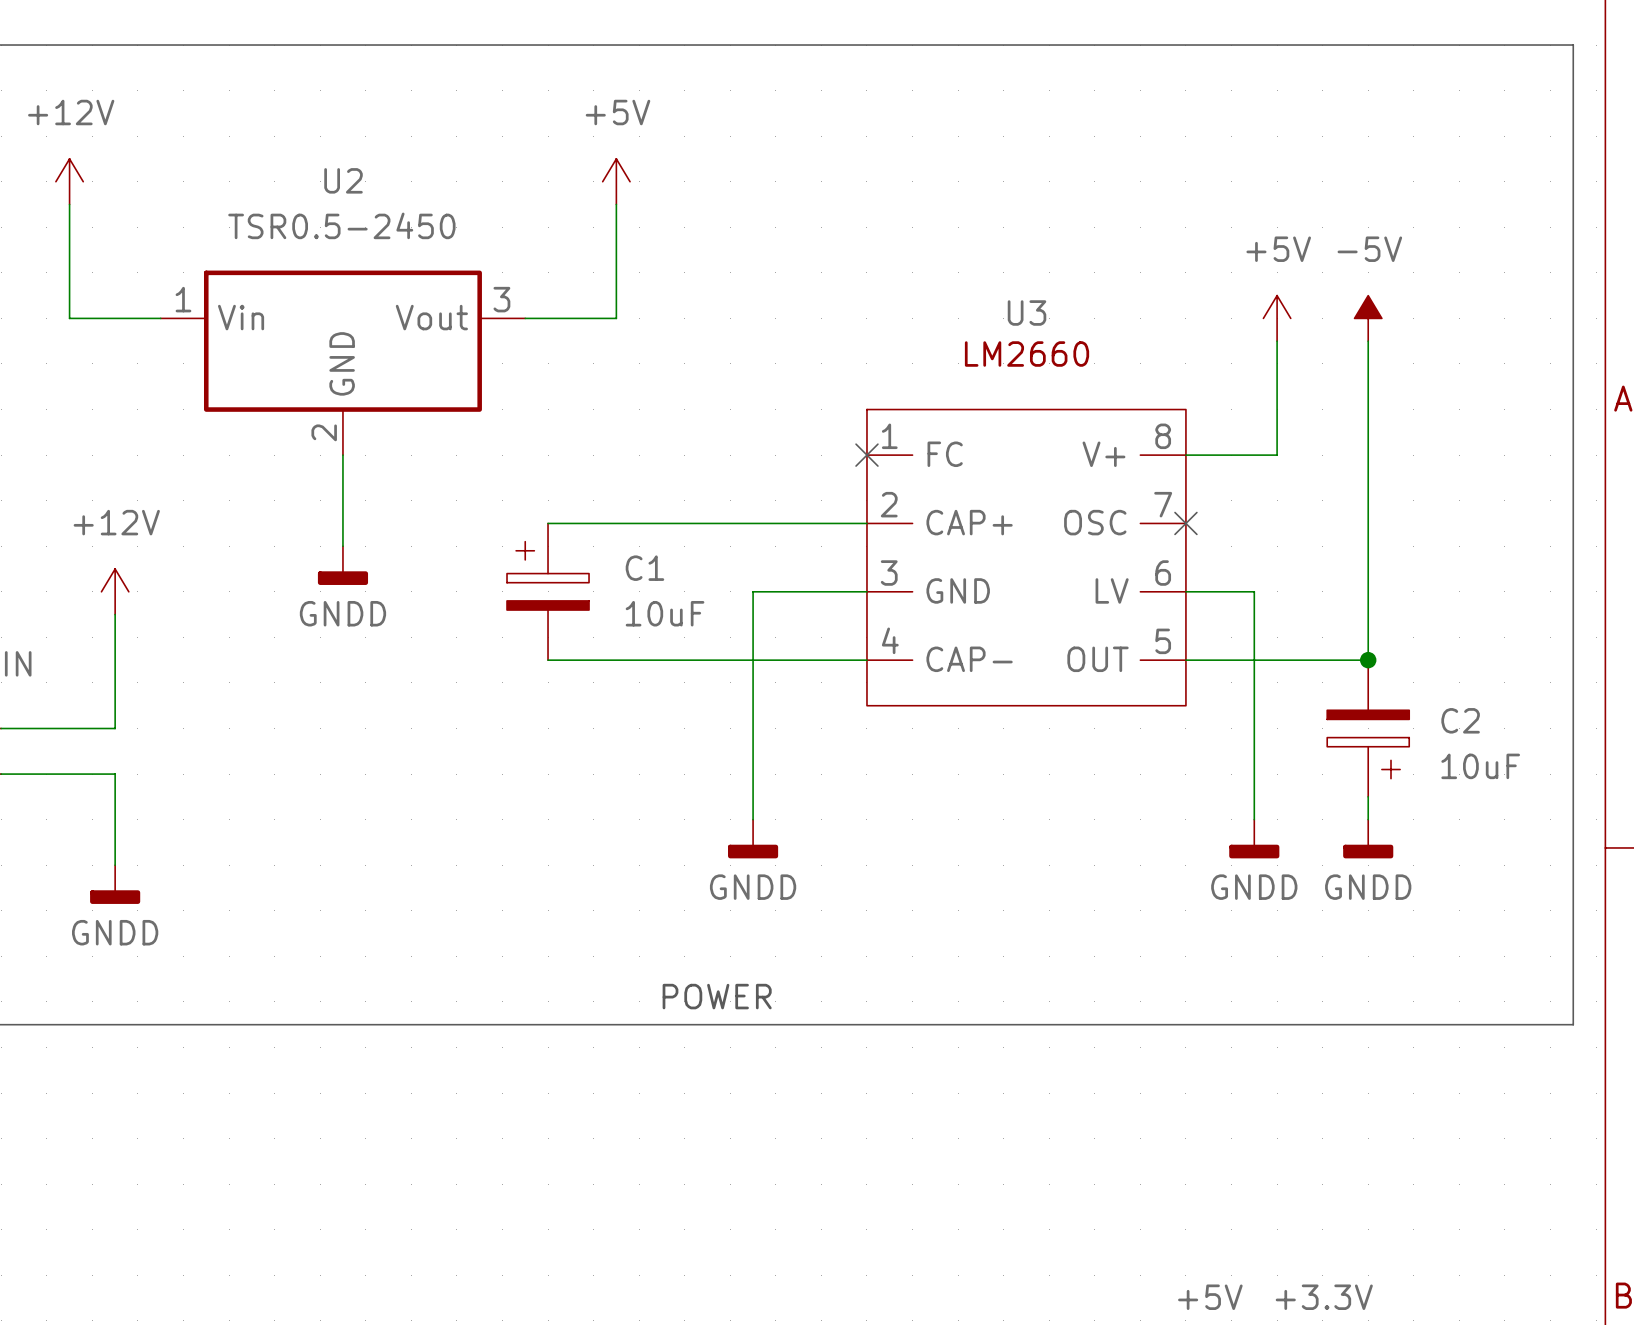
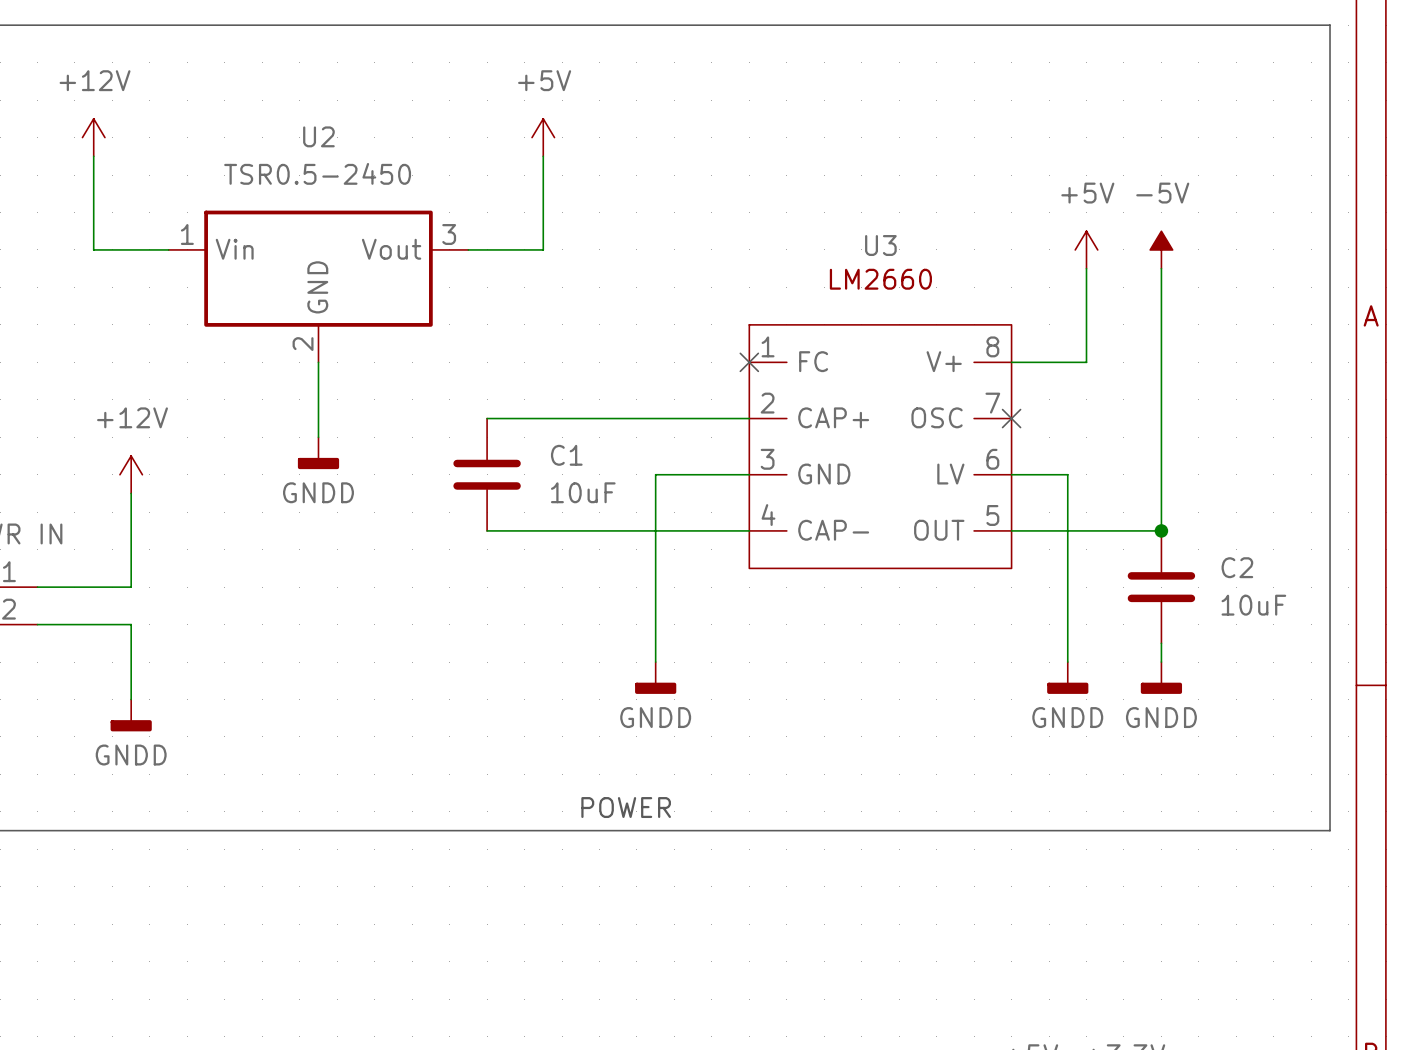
C1 symbol: [507, 523, 590, 661] -> [453, 418, 521, 531]
C2 symbol: [1327, 660, 1410, 797] -> [1127, 530, 1196, 644]

